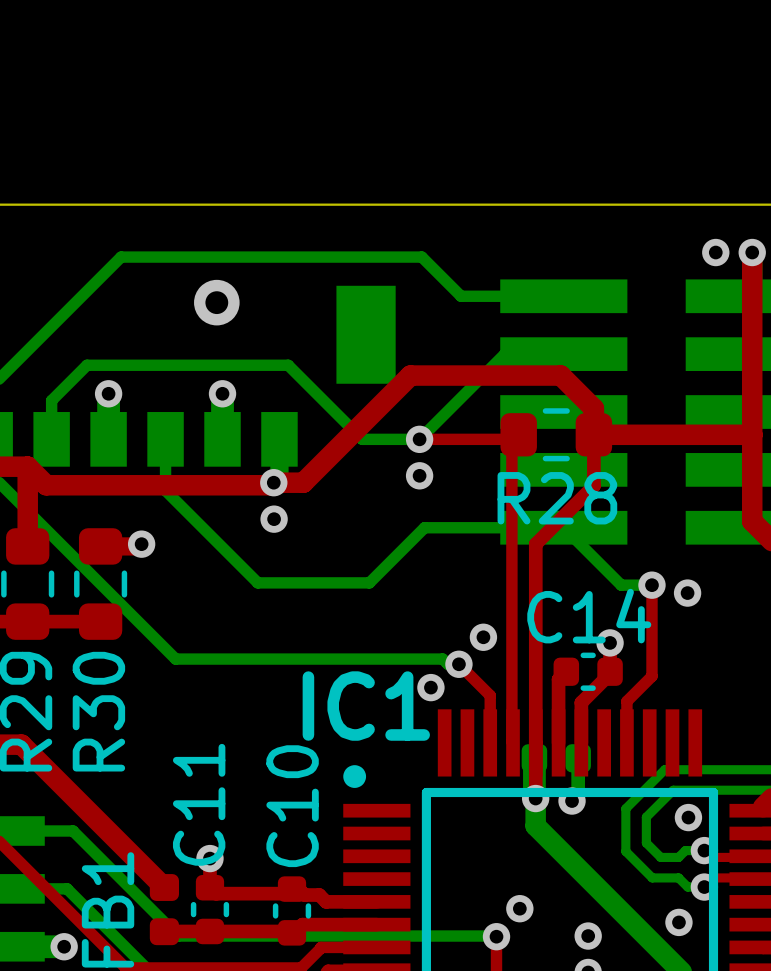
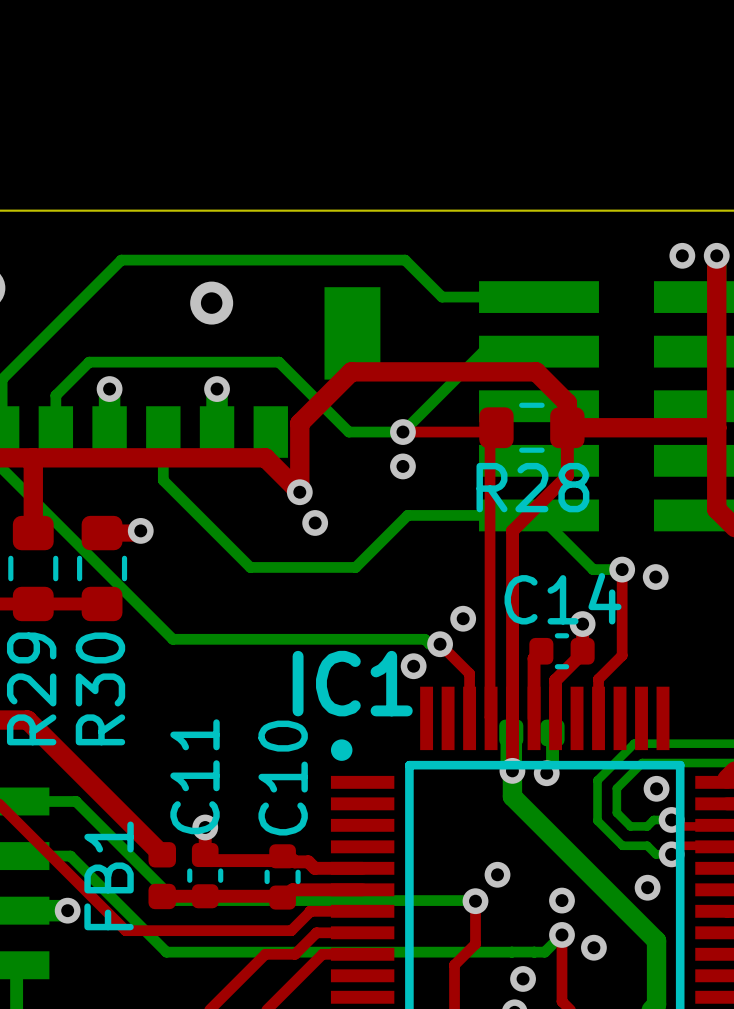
top track: (410, 375) (303, 482) (273, 482) (271, 485) (46, 485) (27, 466) -> (394, 371) (351, 371) (299, 423) (299, 492) (265, 457) (33, 457)
via: (273, 482) -> none
via: none -> (299, 492)
via: (274, 519) -> none
via: none -> (315, 522)

